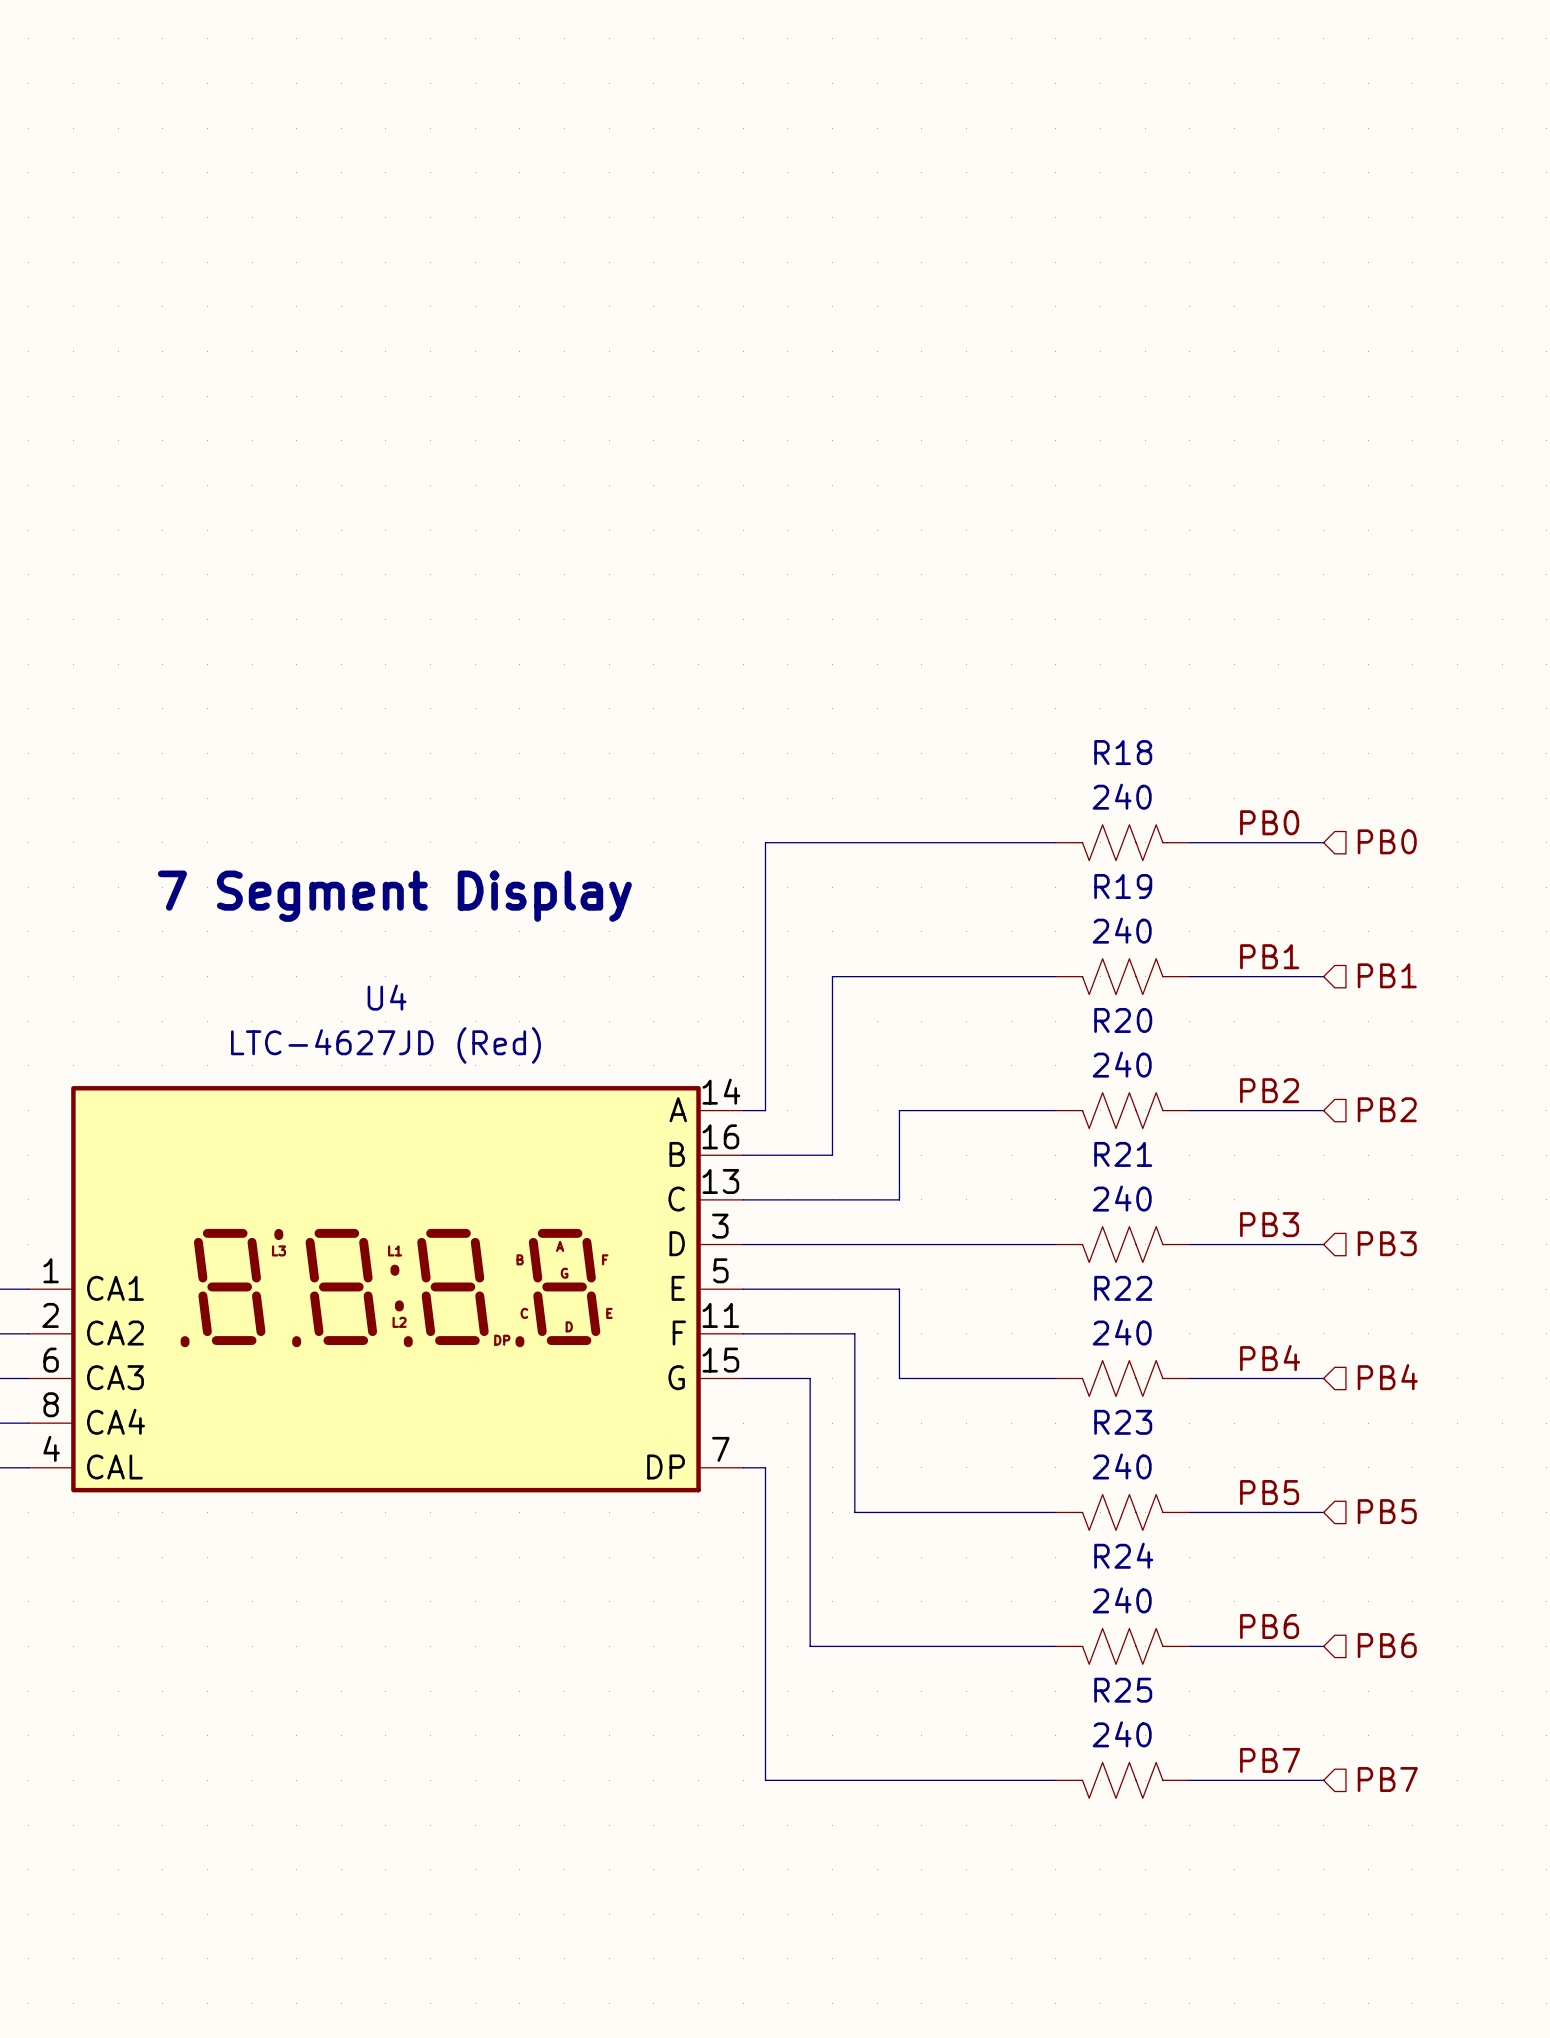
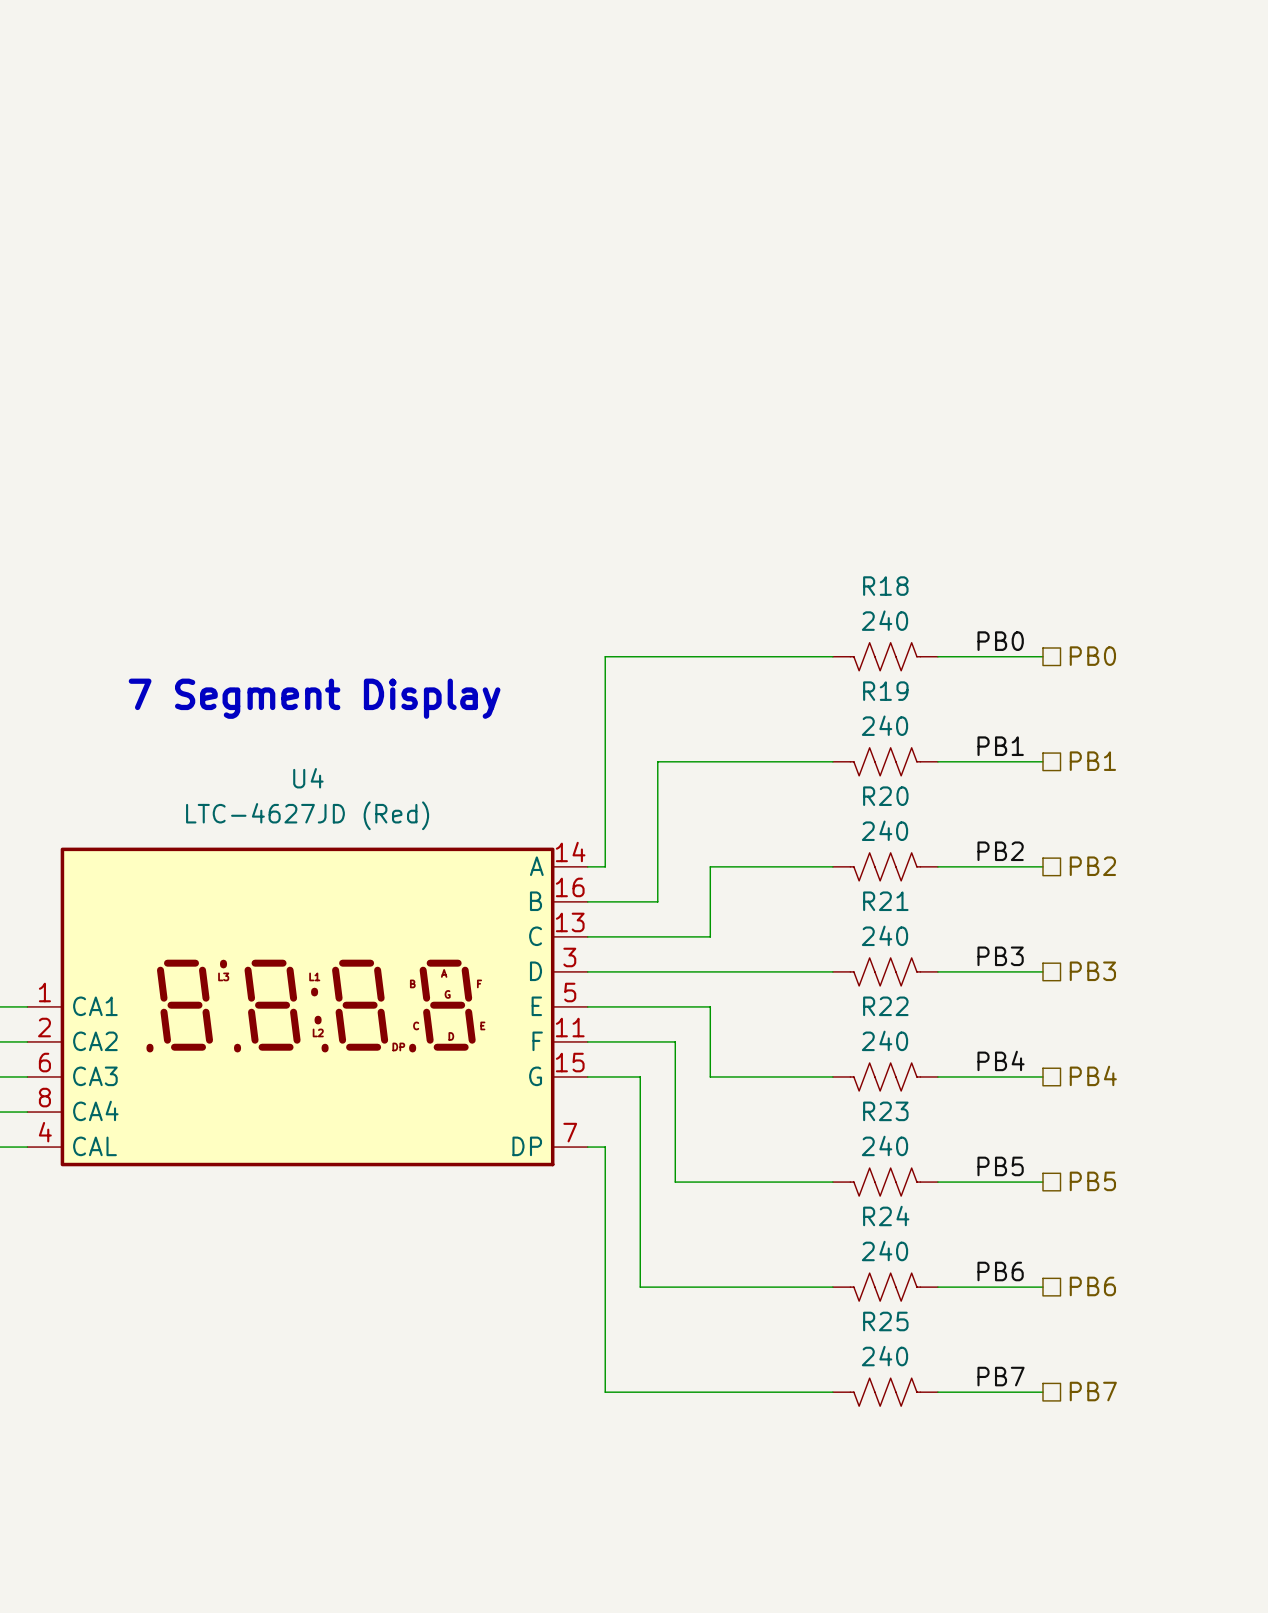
hierarchical label shape: input (1387, 841) -> passive (1092, 656)
hierarchical label shape: input (1387, 975) -> passive (1092, 761)
hierarchical label shape: input (1387, 1109) -> passive (1092, 866)
hierarchical label shape: input (1387, 1243) -> passive (1092, 971)
hierarchical label shape: input (1387, 1377) -> passive (1093, 1075)
hierarchical label shape: input (1387, 1511) -> passive (1092, 1181)
hierarchical label shape: input (1387, 1645) -> passive (1092, 1286)
hierarchical label shape: input (1387, 1779) -> passive (1093, 1391)

